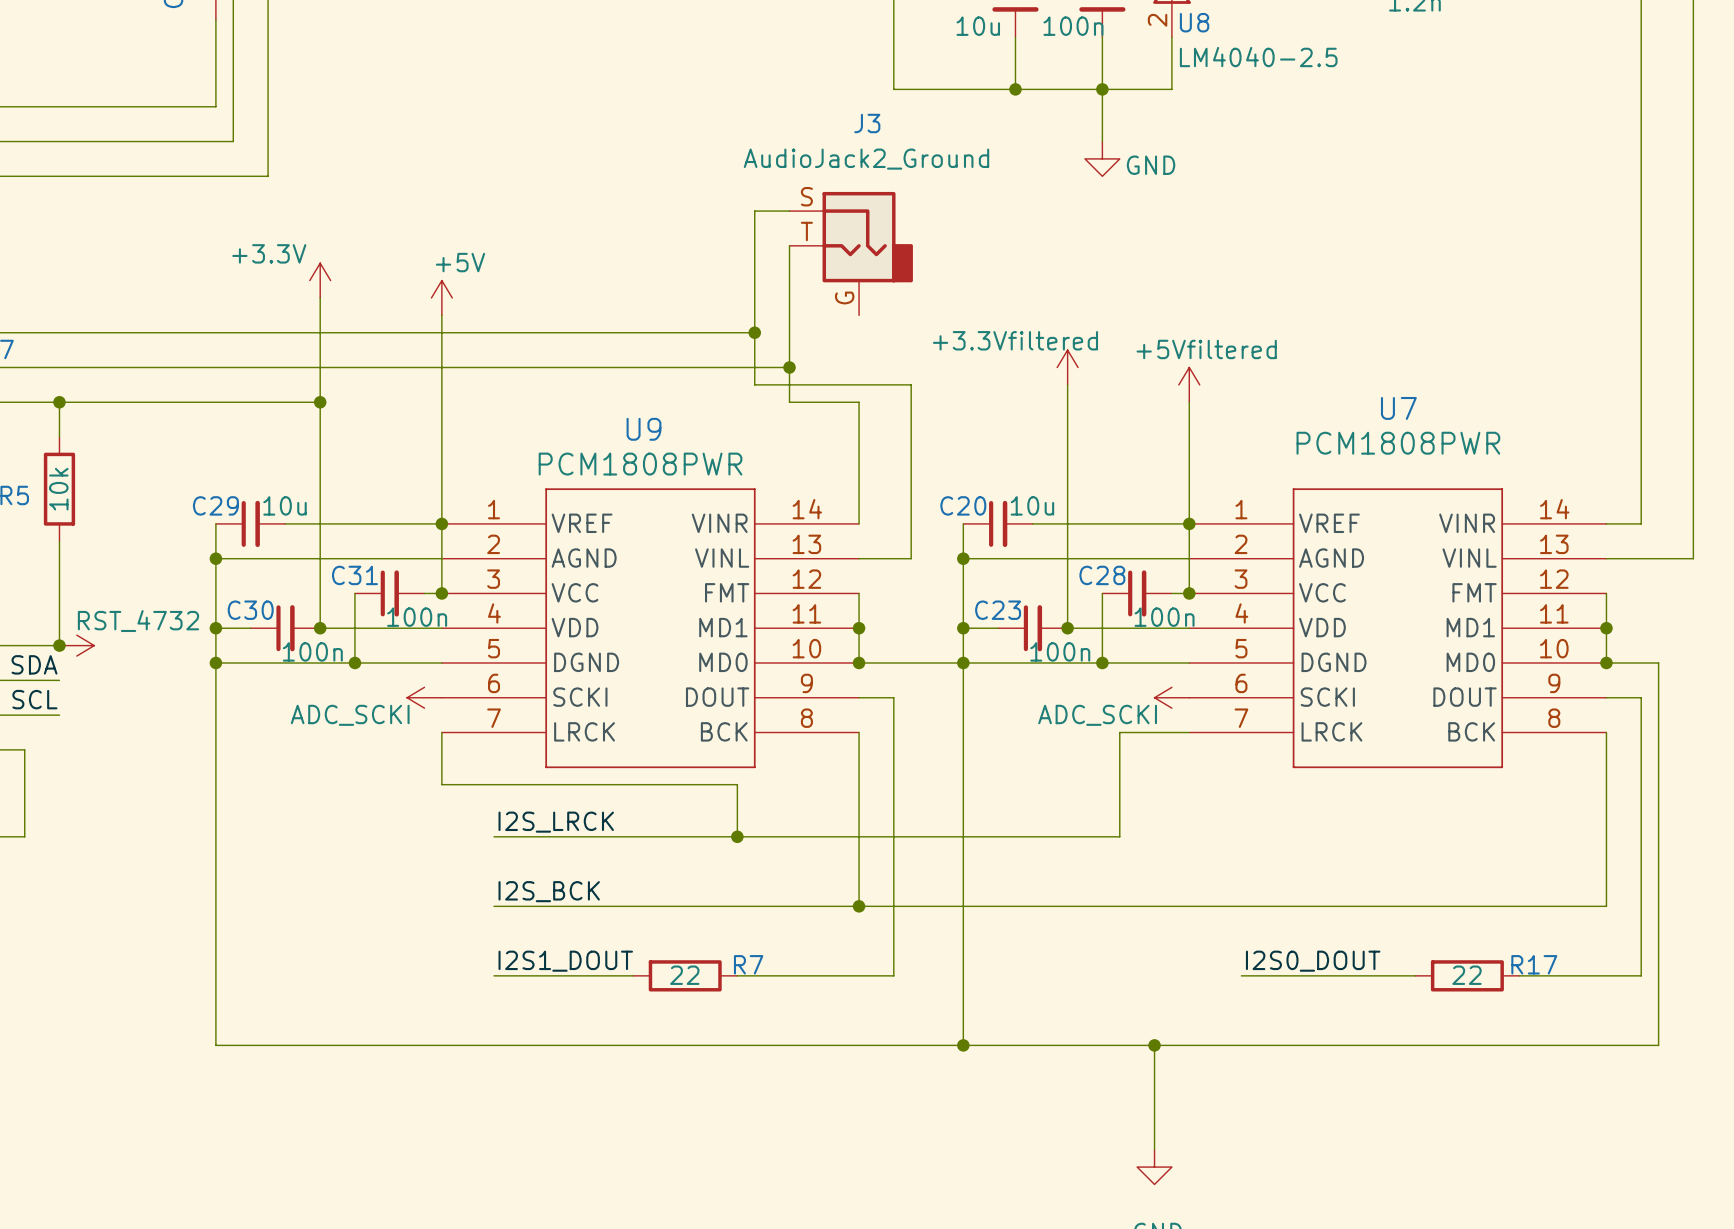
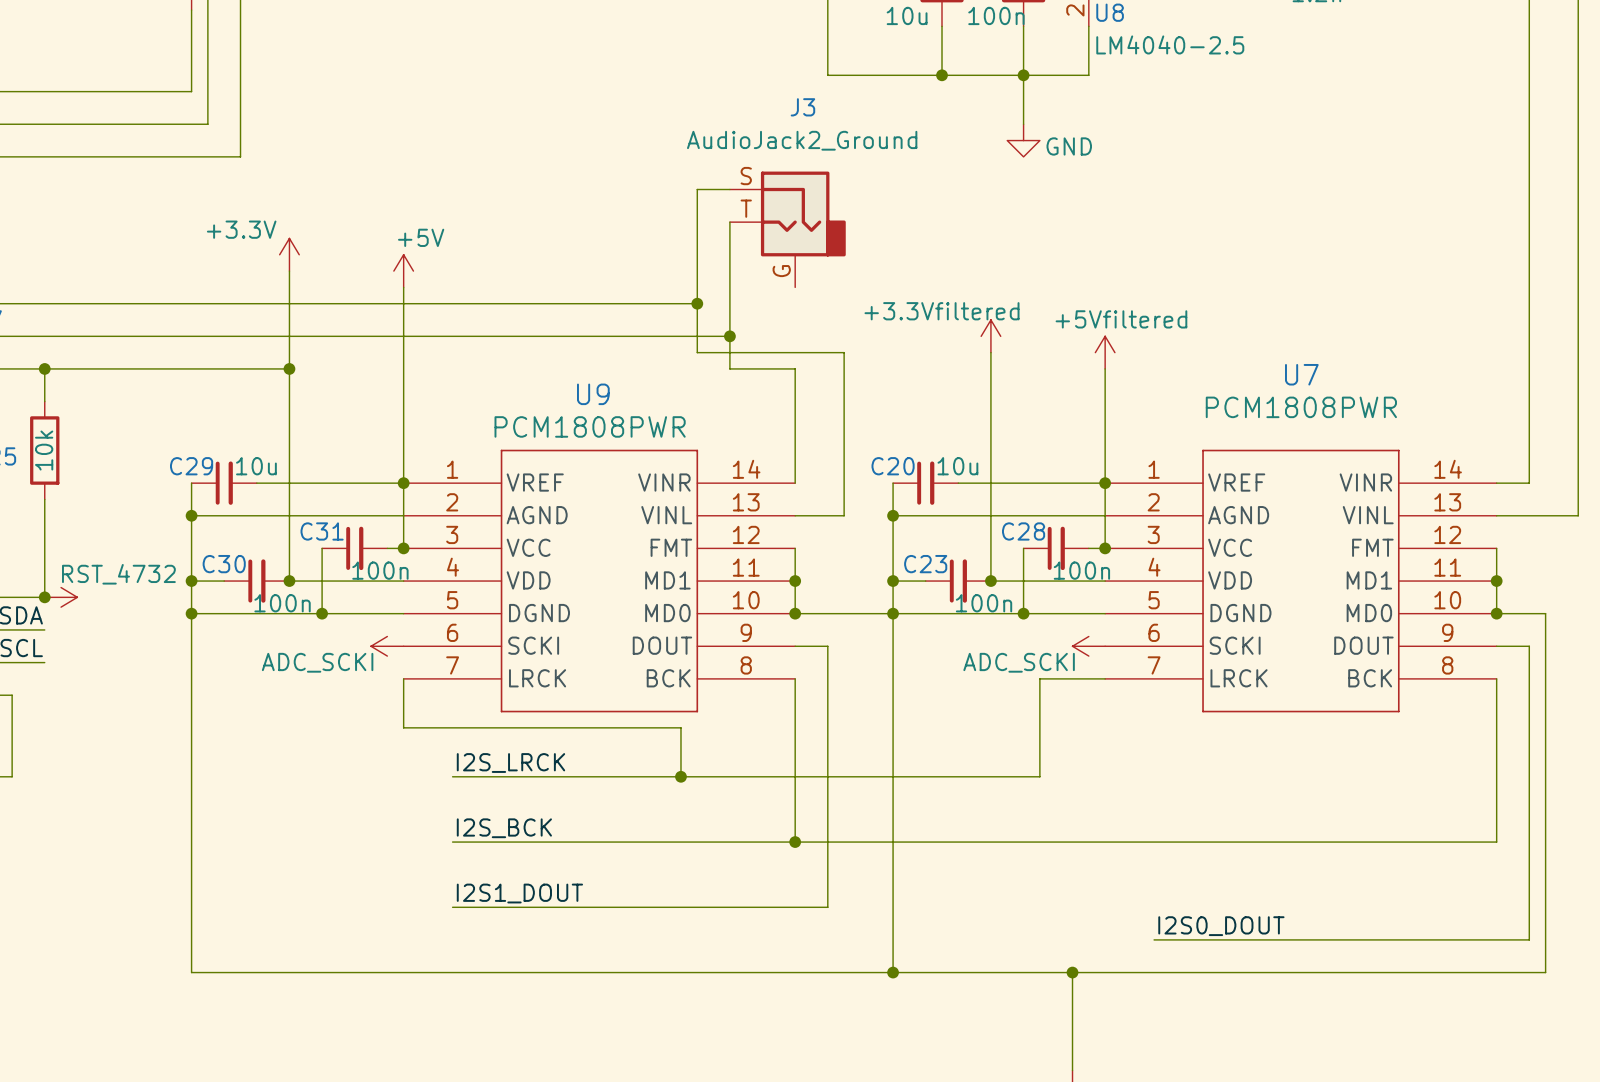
label position: I2S0_DOUT (1313, 961) -> I2S0_DOUT (1221, 926)
wire: none -> (583, 907) (680, 907)
R7: 22 (685, 975) -> none
wire: (1241, 975) (1415, 975) -> none
R17: 22 (1467, 975) -> none
wire: (1519, 975) (1641, 975) -> (1154, 939) (1529, 939) (1529, 907)

